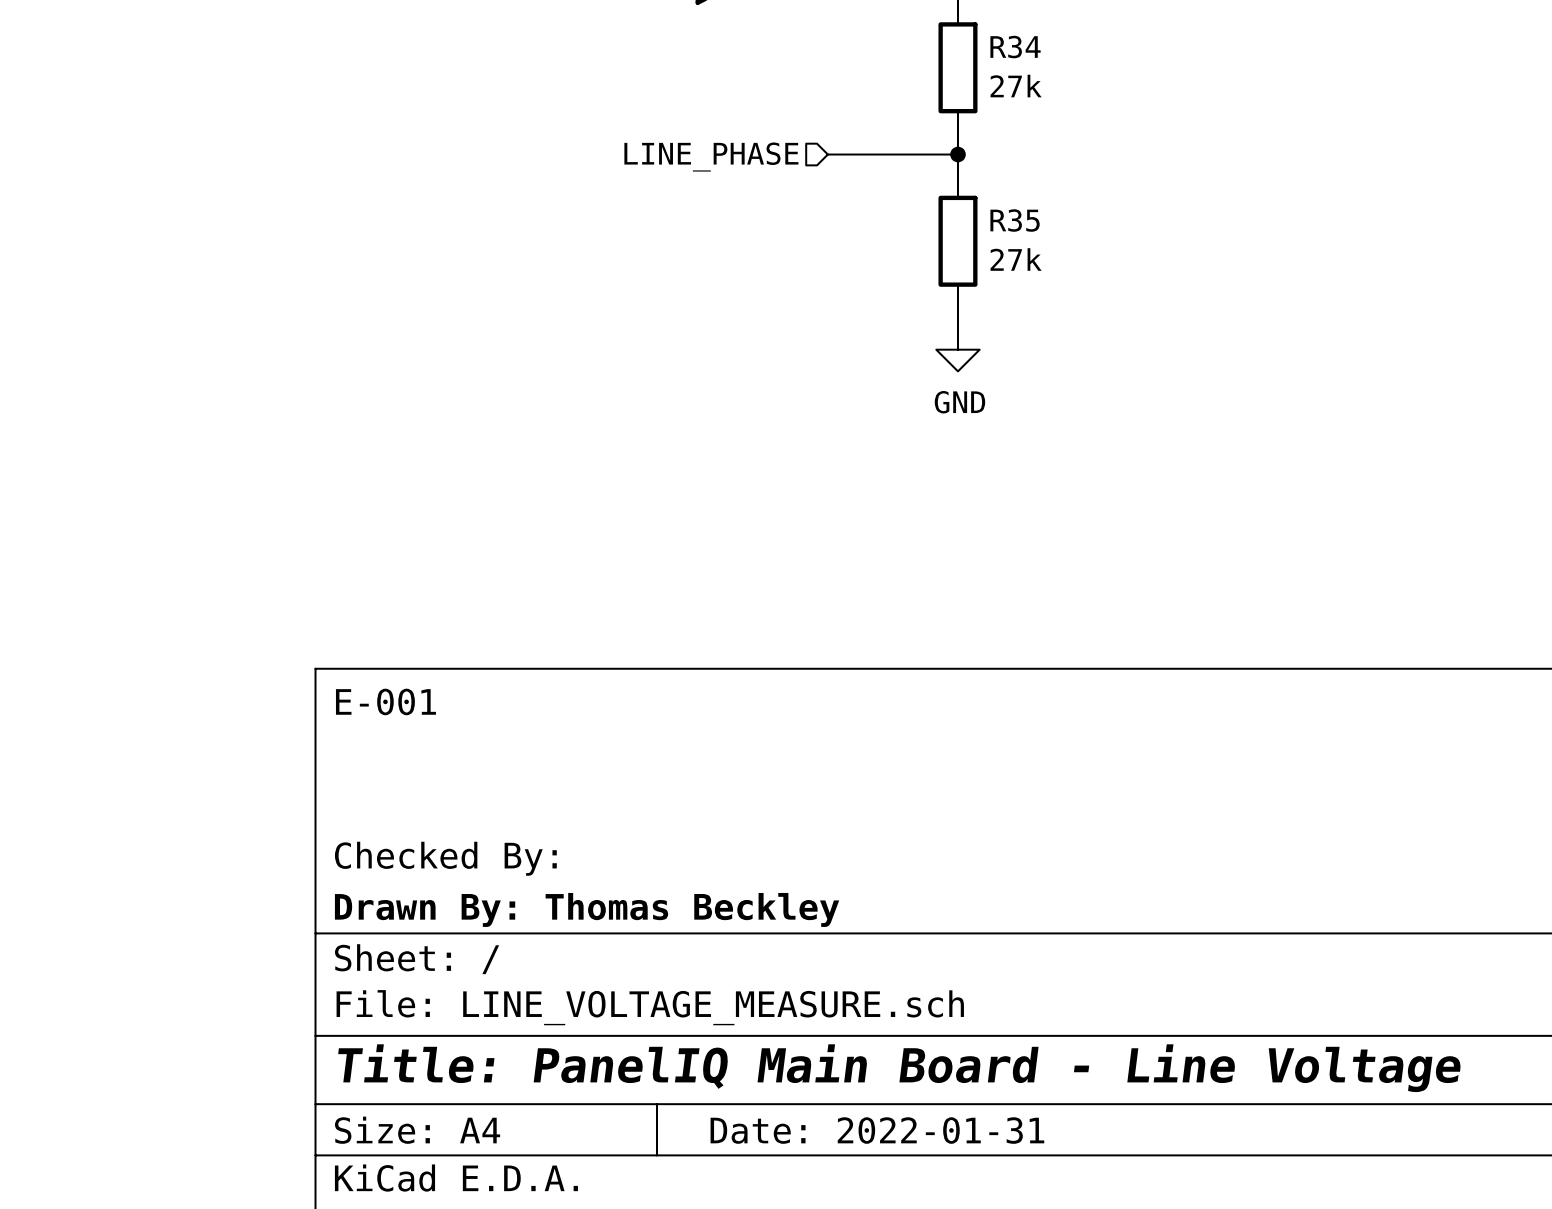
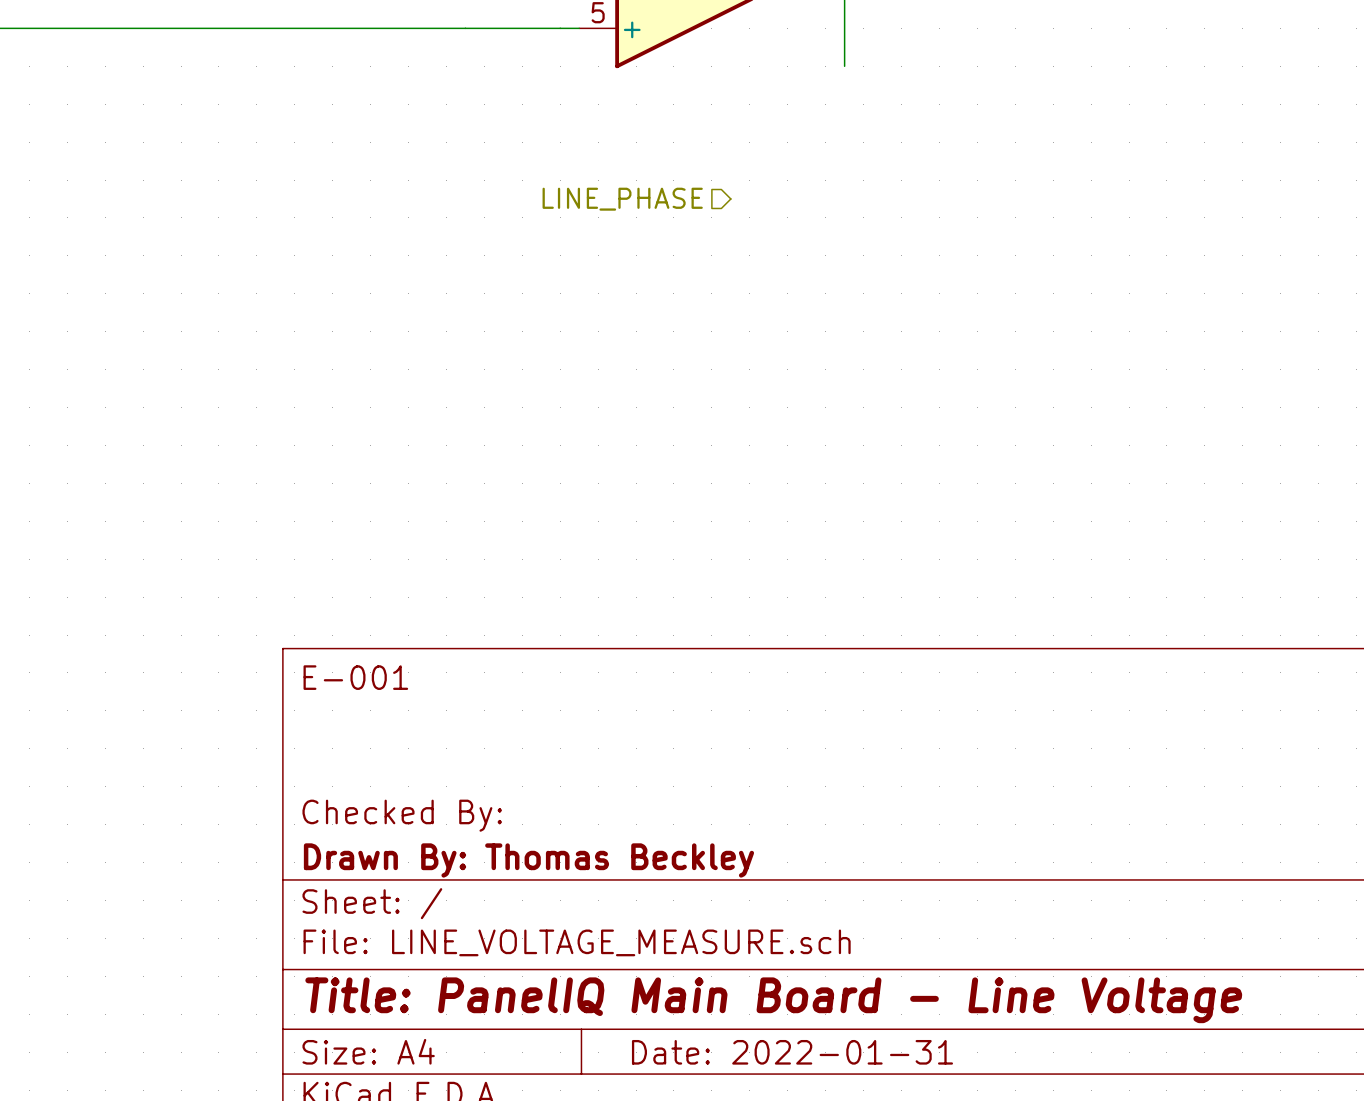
R34: 27k (957, 67) -> none
wire: (957, 132) (957, 176) -> none
wire: (827, 154) (957, 154) -> none
junction: (957, 154) -> none
R35: 27k (957, 241) -> none
wire: (957, 306) (957, 328) -> none
power symbol: GND (957, 349) -> none

